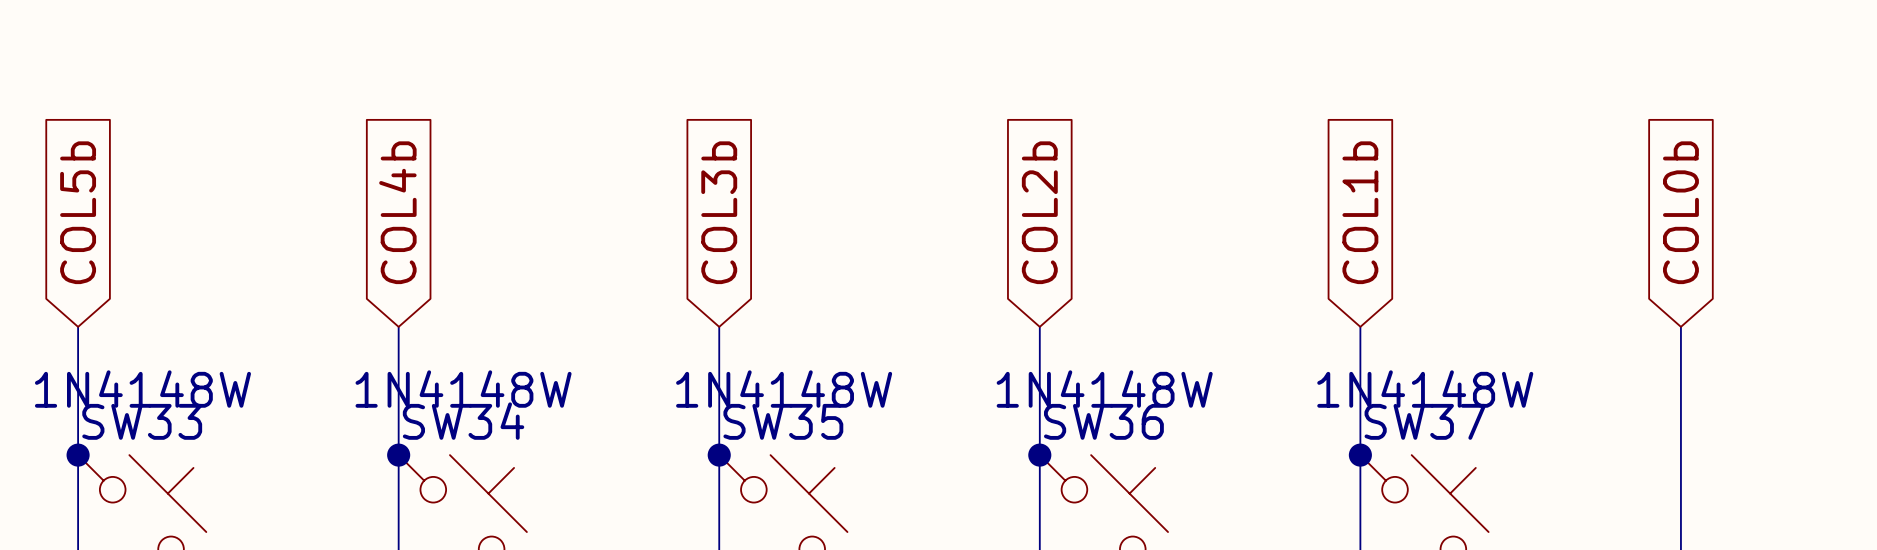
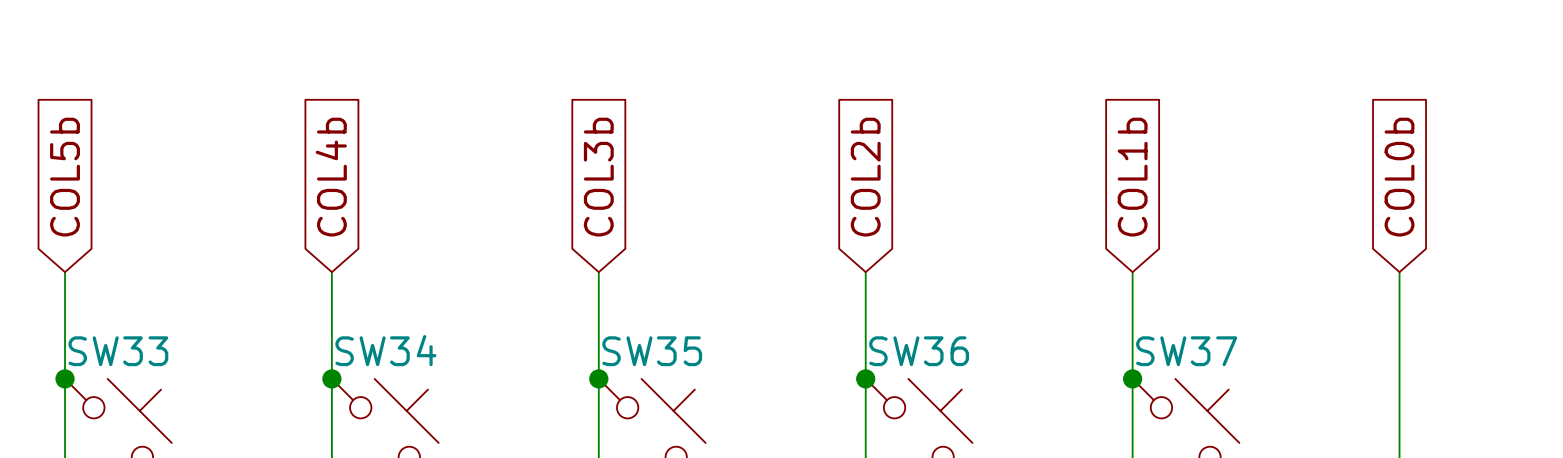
SW33 value: 1N4148W (142, 389) -> none
SW34 value: 1N4148W (463, 389) -> none
SW35 value: 1N4148W (784, 389) -> none
SW36 value: 1N4148W (1104, 389) -> none
SW37 value: 1N4148W (1425, 389) -> none

